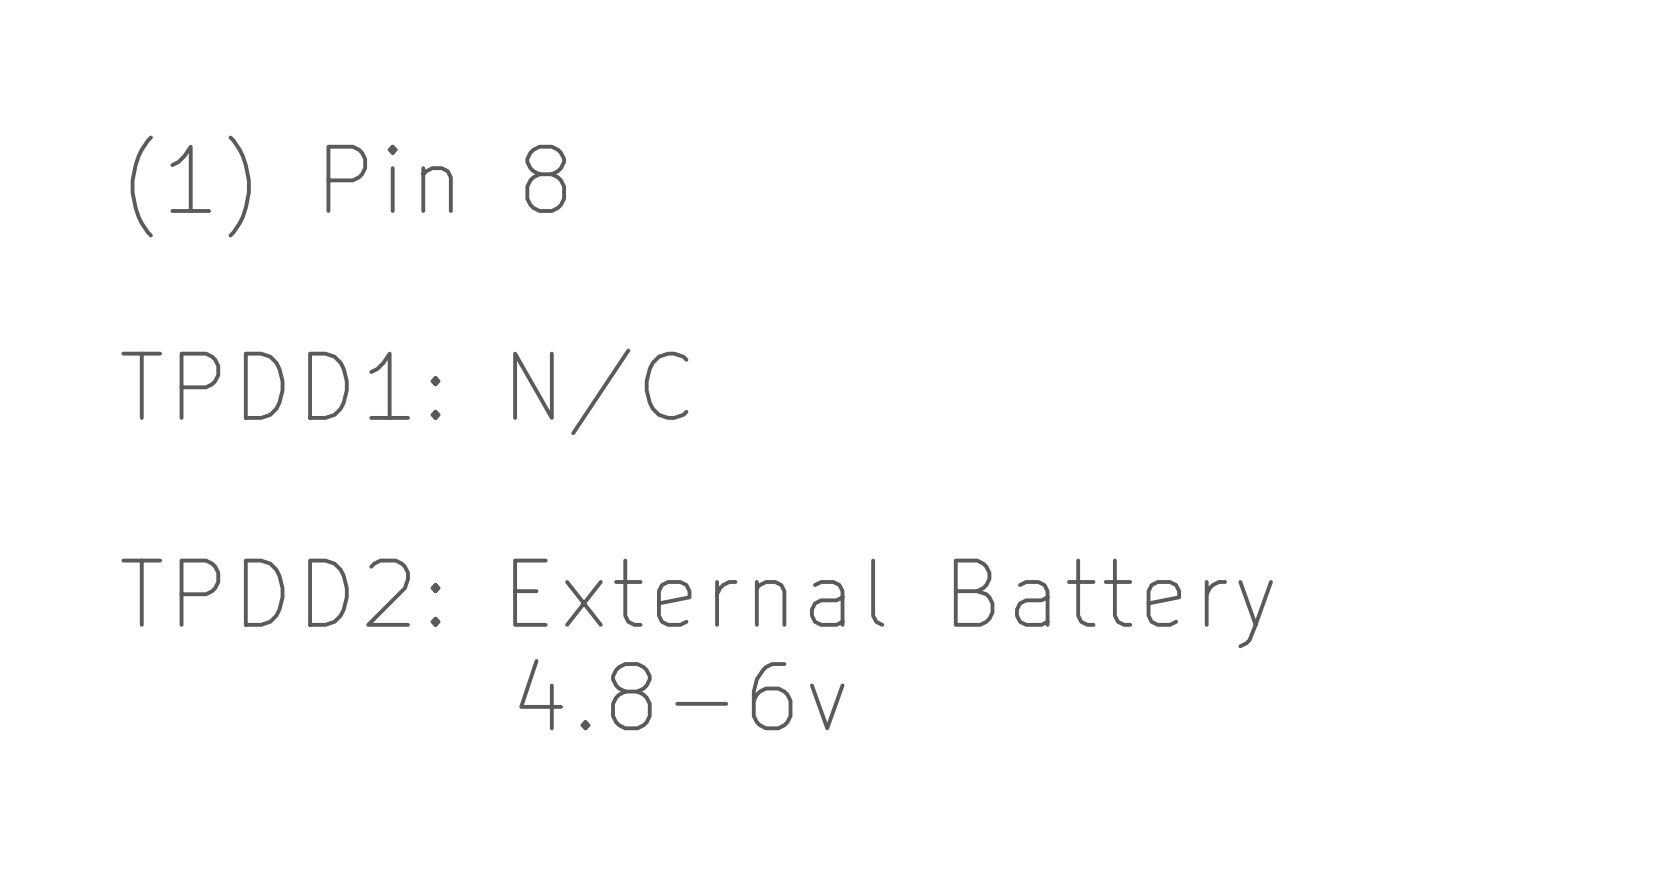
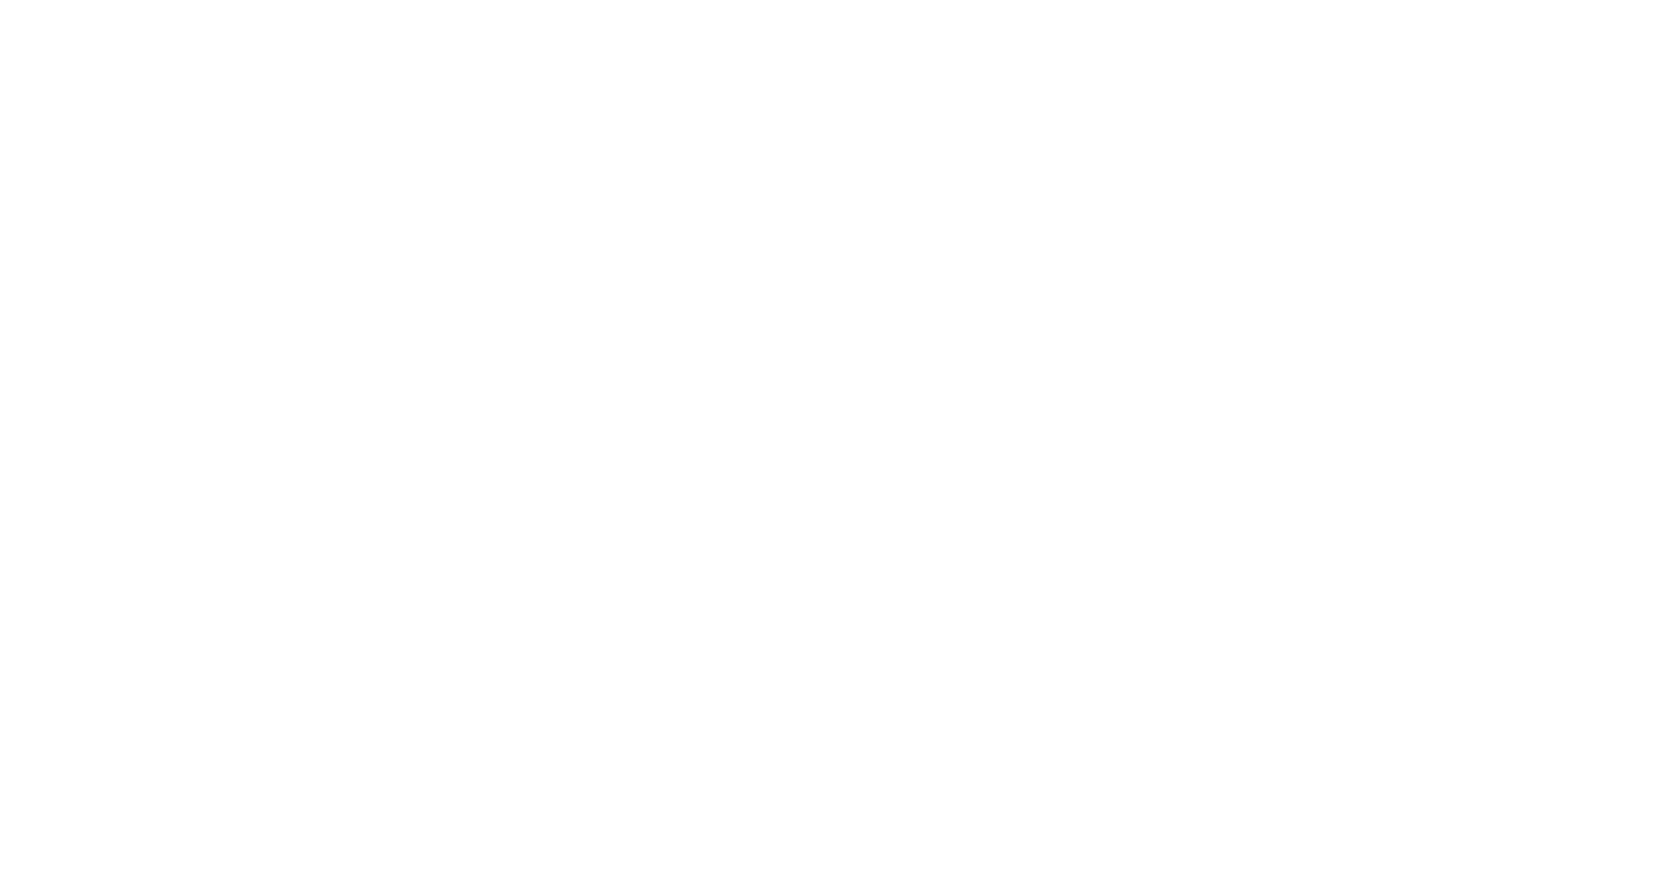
text: (1) Pin 8 (348, 186) -> none
text: TPDD1: N/C (404, 391) -> none
text: TPDD2: External Battery (697, 603) -> none
text: 4.8-6v (681, 694) -> none

